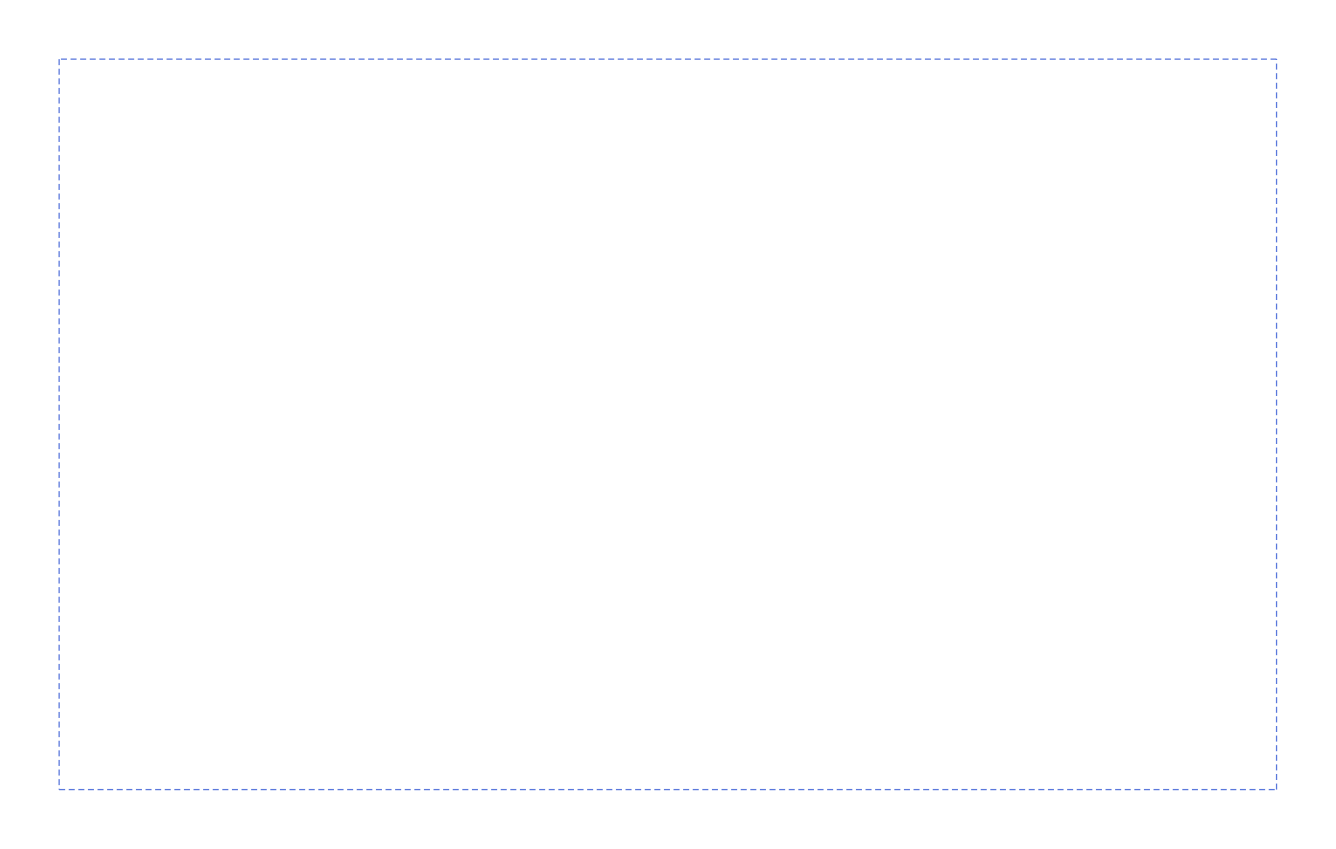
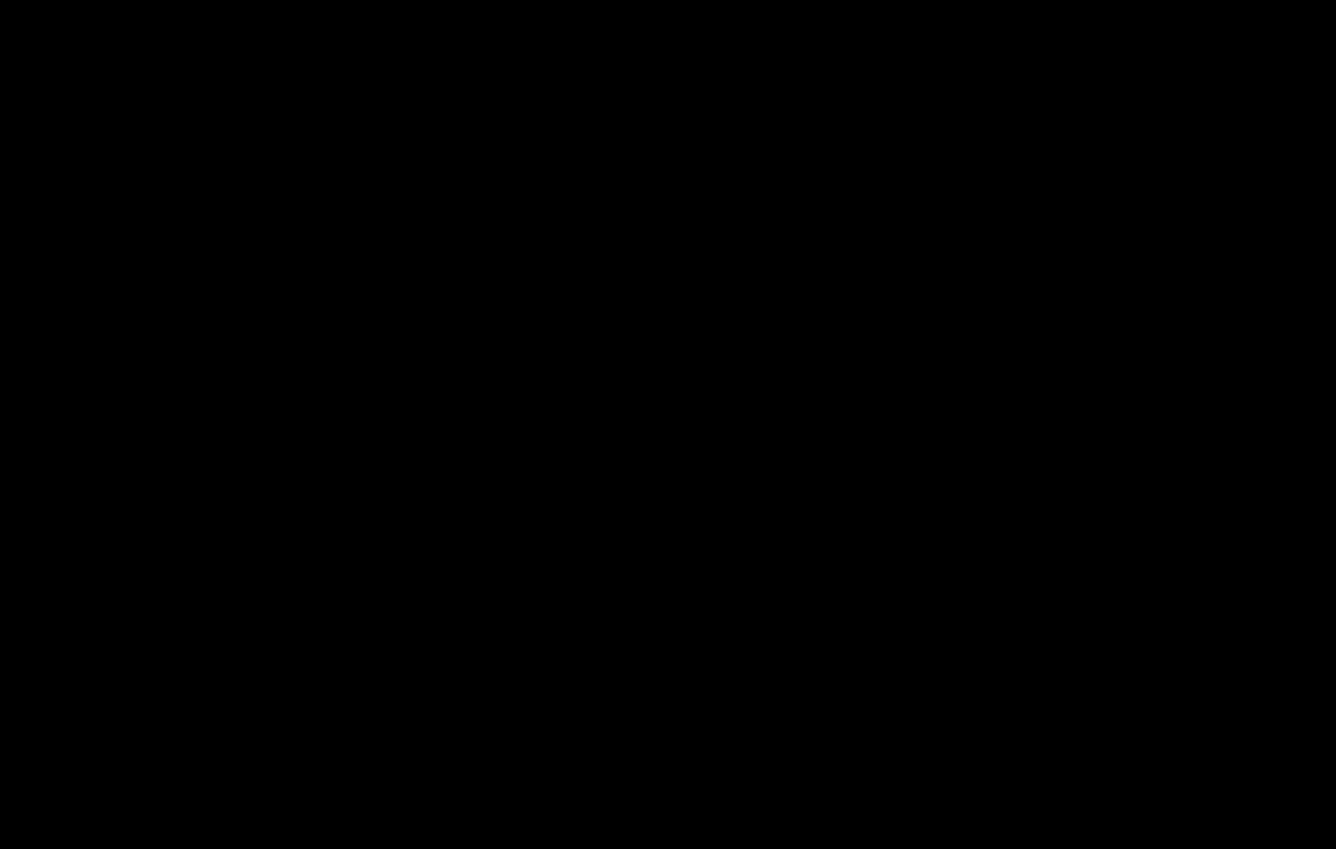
bottom zone outline: (1276, 59) (59, 59) (59, 789) (1276, 789) (1276, 59) -> none

